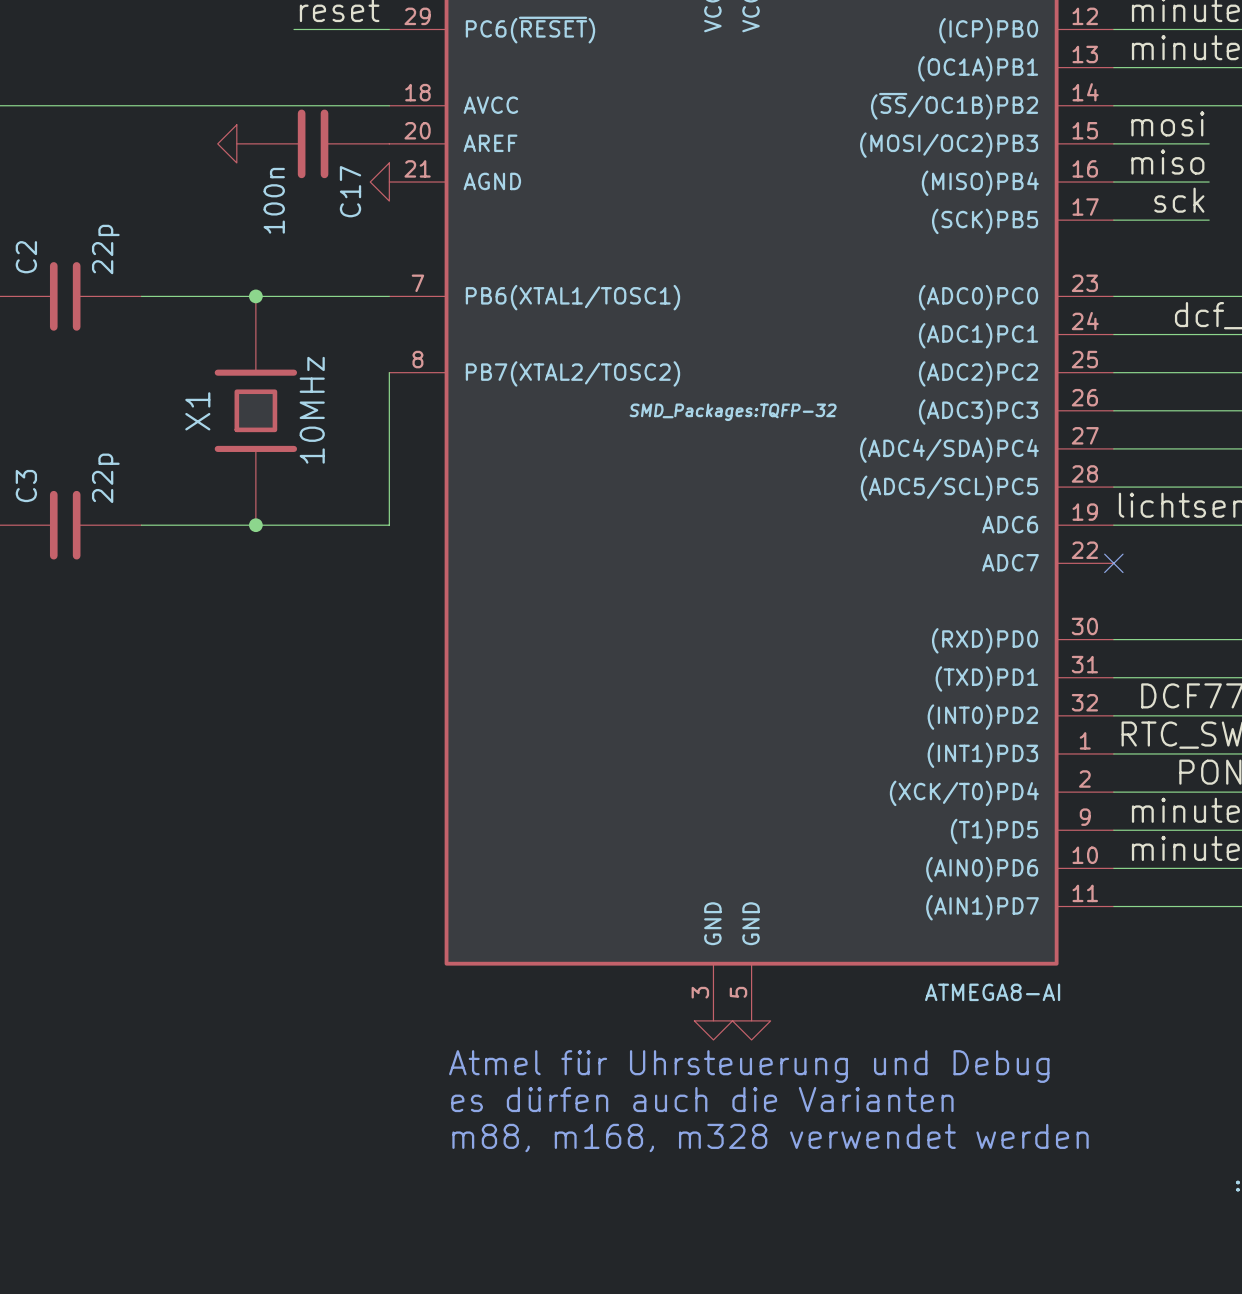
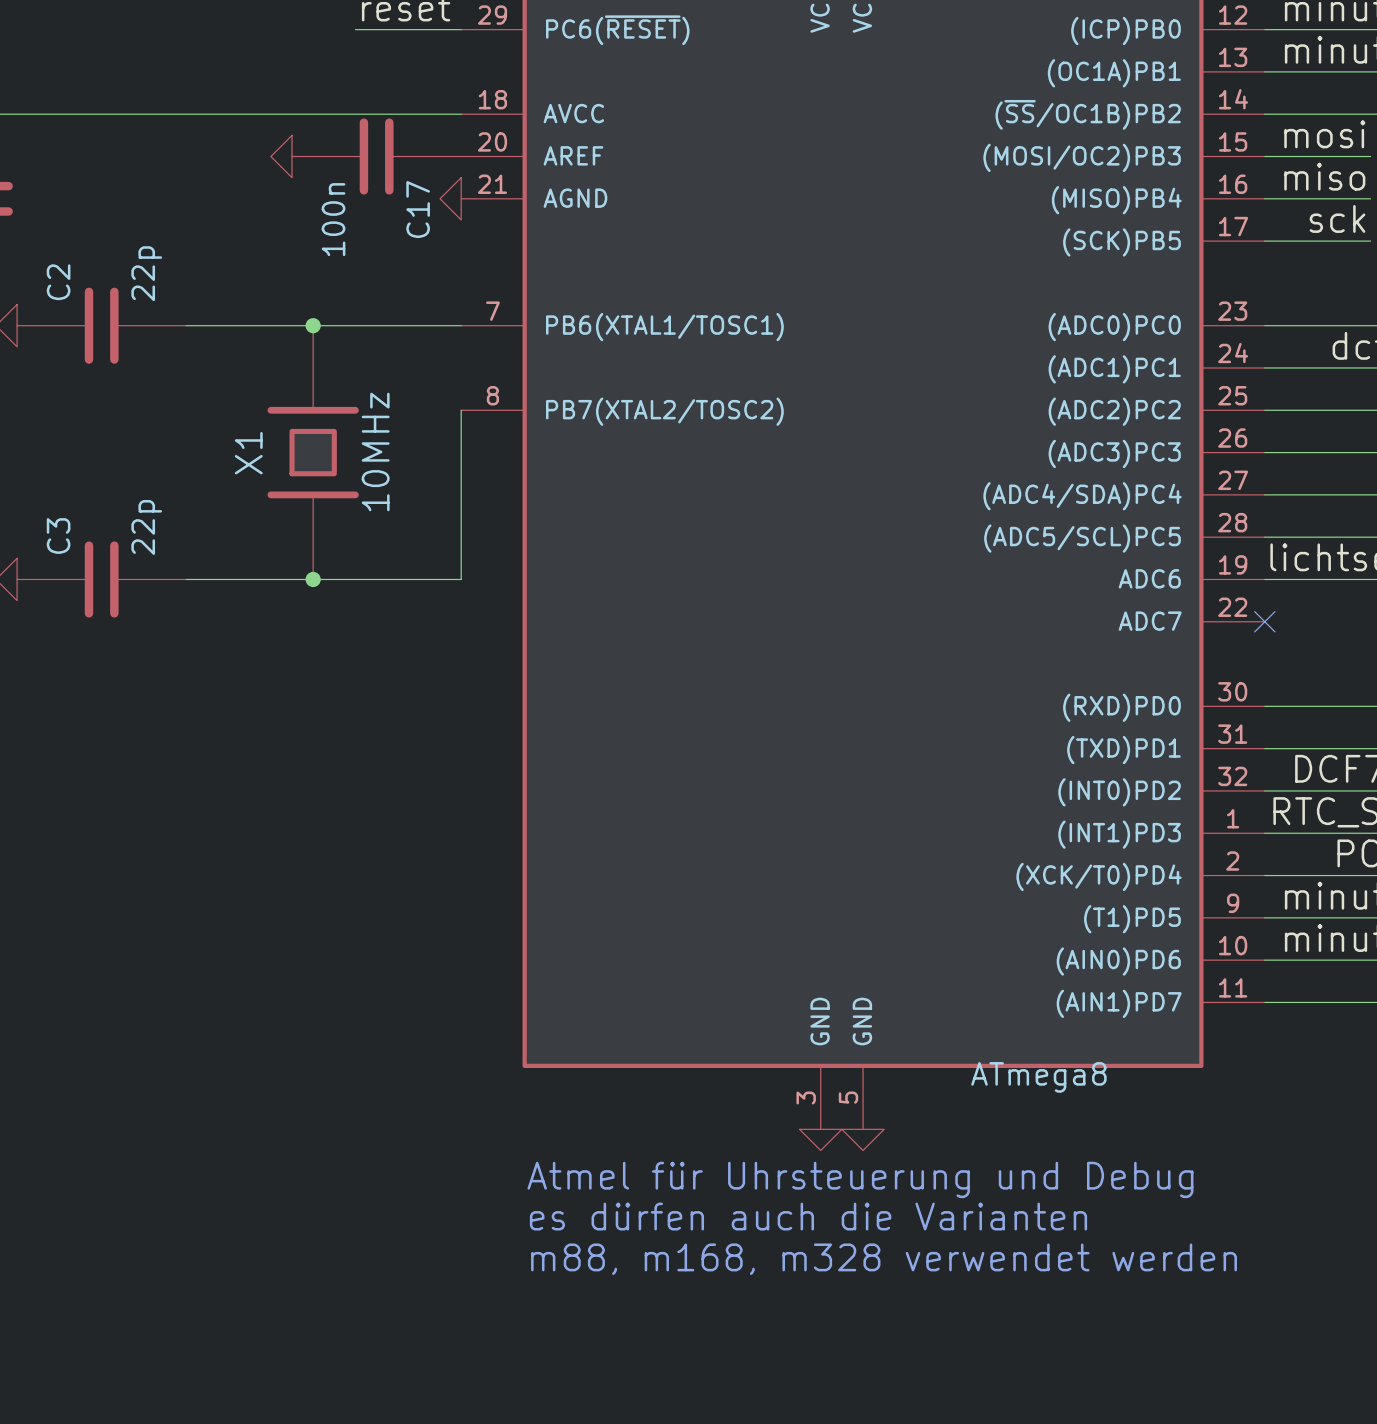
part text: SMD_Packages:TQFP-32 (733, 412) -> none
part value: ATMEGA8-AI (992, 992) -> ATmega8 (1038, 1077)

